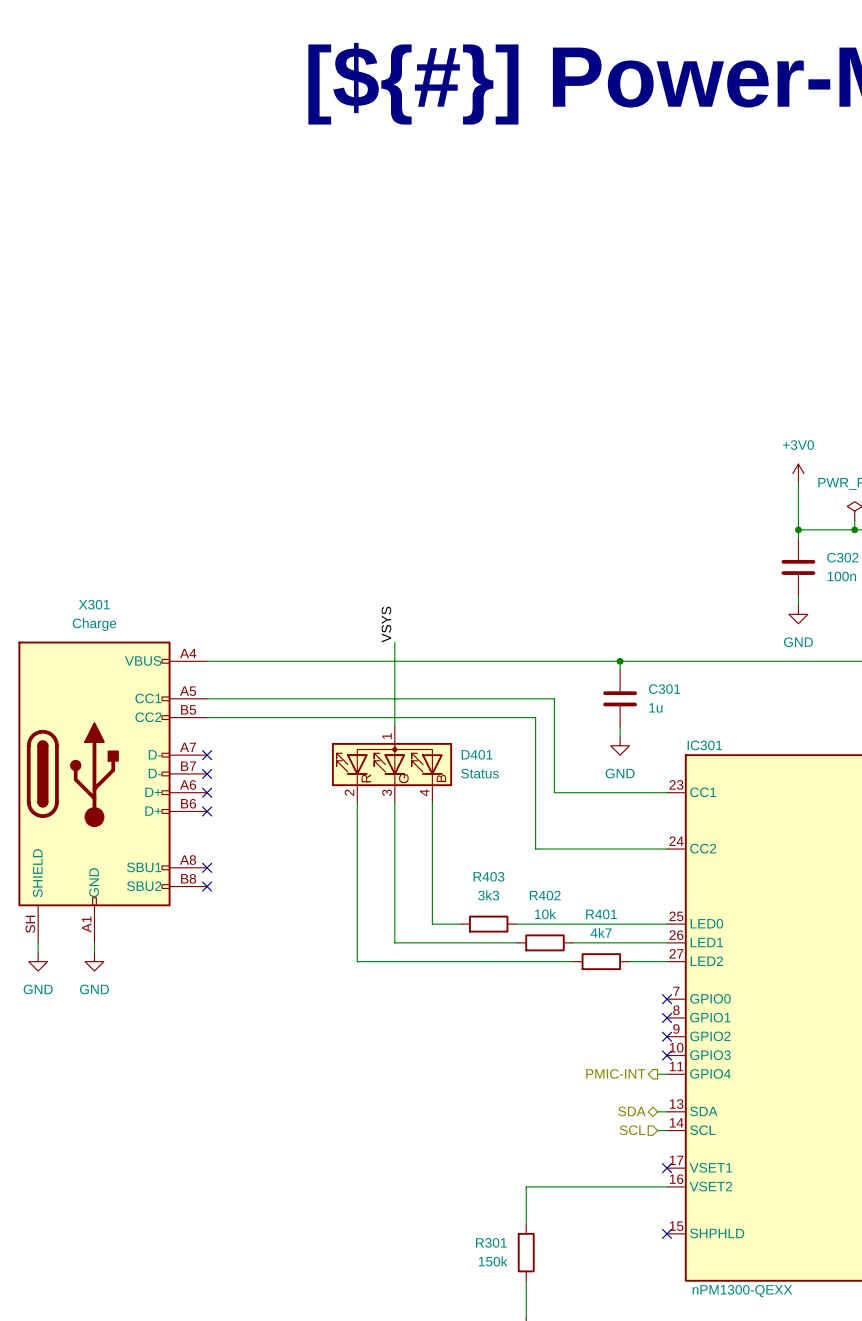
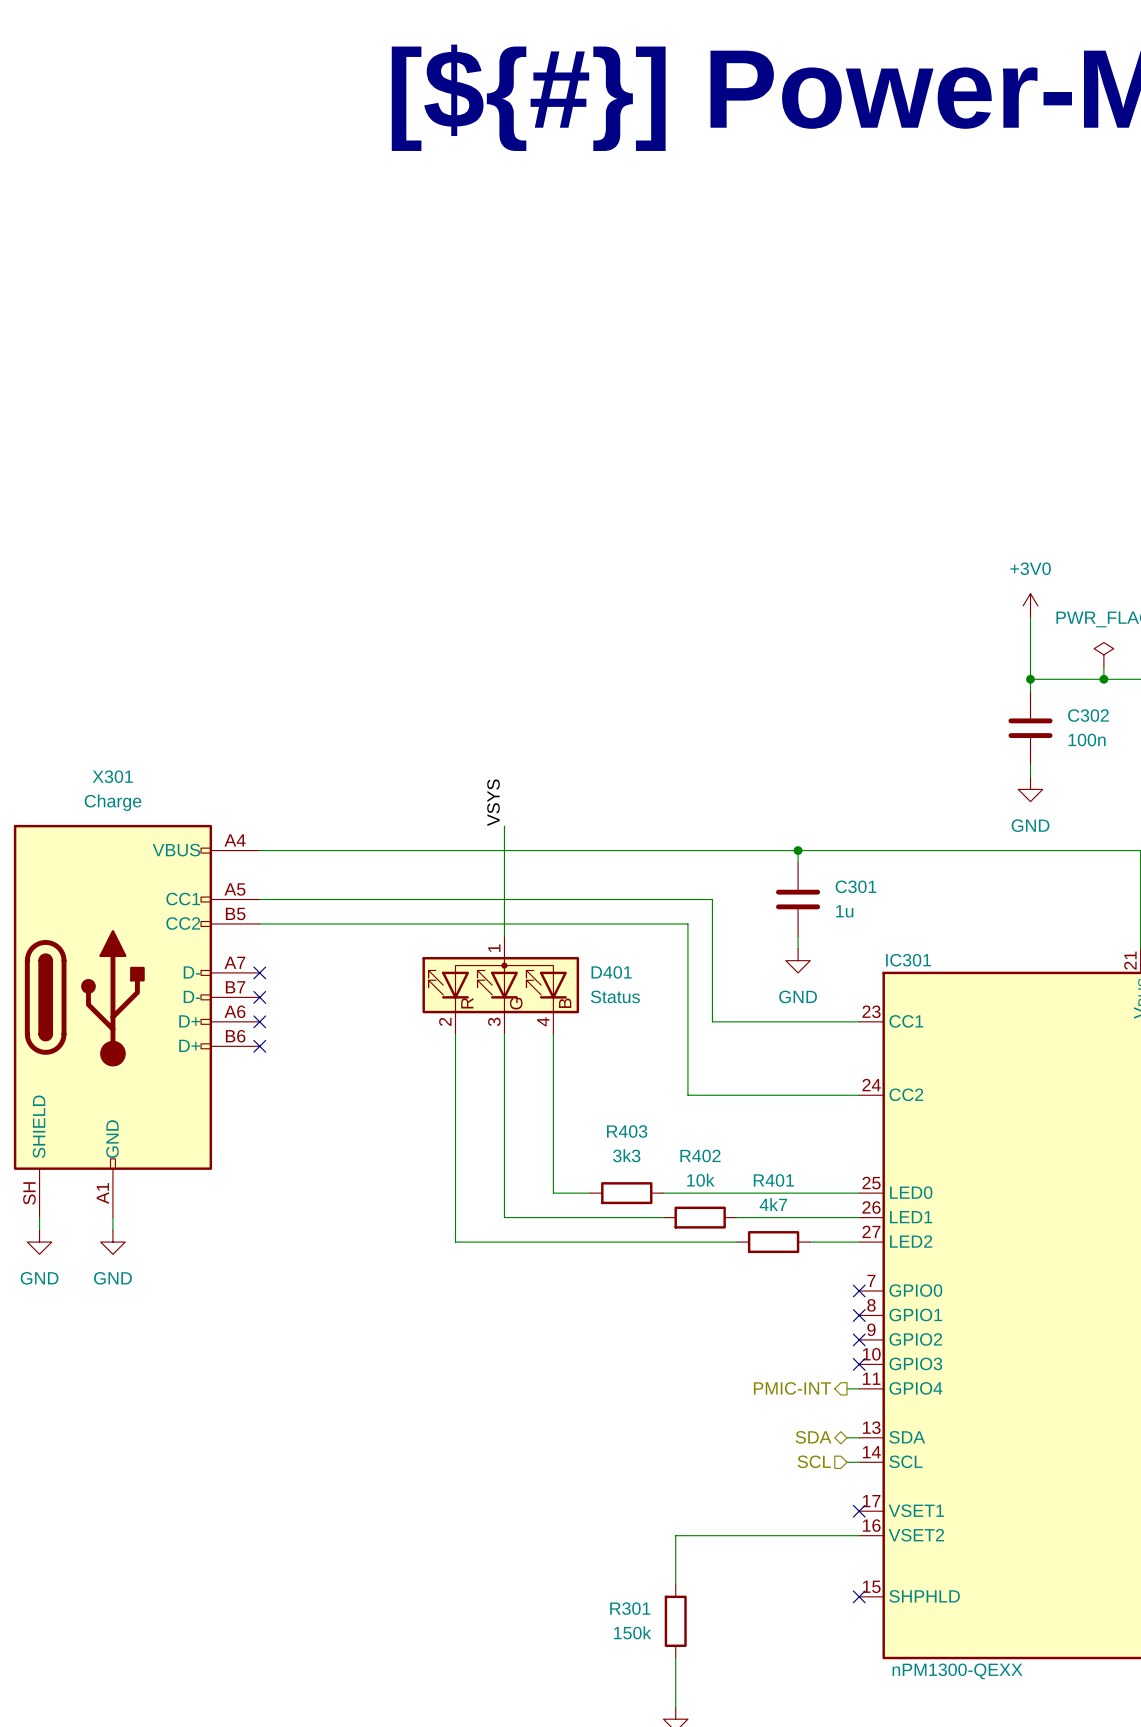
X301 symbol: [18, 641, 208, 943] -> [13, 824, 260, 1218]
no-connect mark: (207, 867) -> none
no-connect mark: (207, 886) -> none

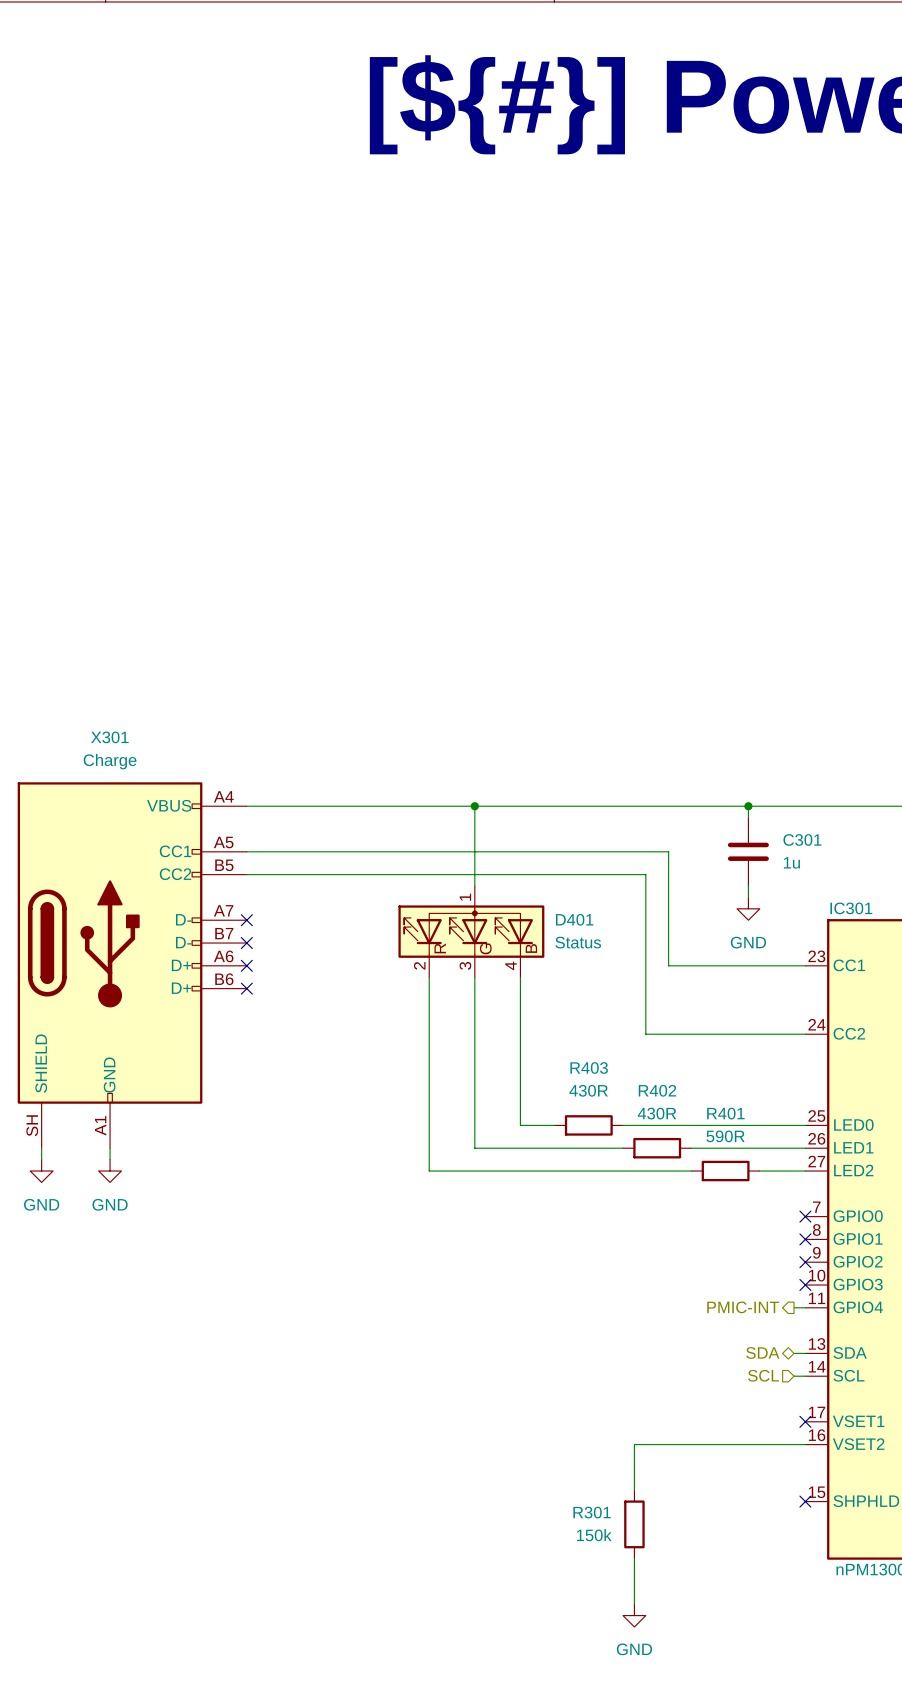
label: VSYS (493, 802) -> none
wire: (504, 826) (504, 850) -> none
junction: none -> (474, 806)
R403 value: 3k3 (626, 1155) -> 430R (588, 1090)
R402 value: 10k (700, 1180) -> 430R (657, 1113)
R401 value: 4k7 (773, 1204) -> 590R (725, 1136)

